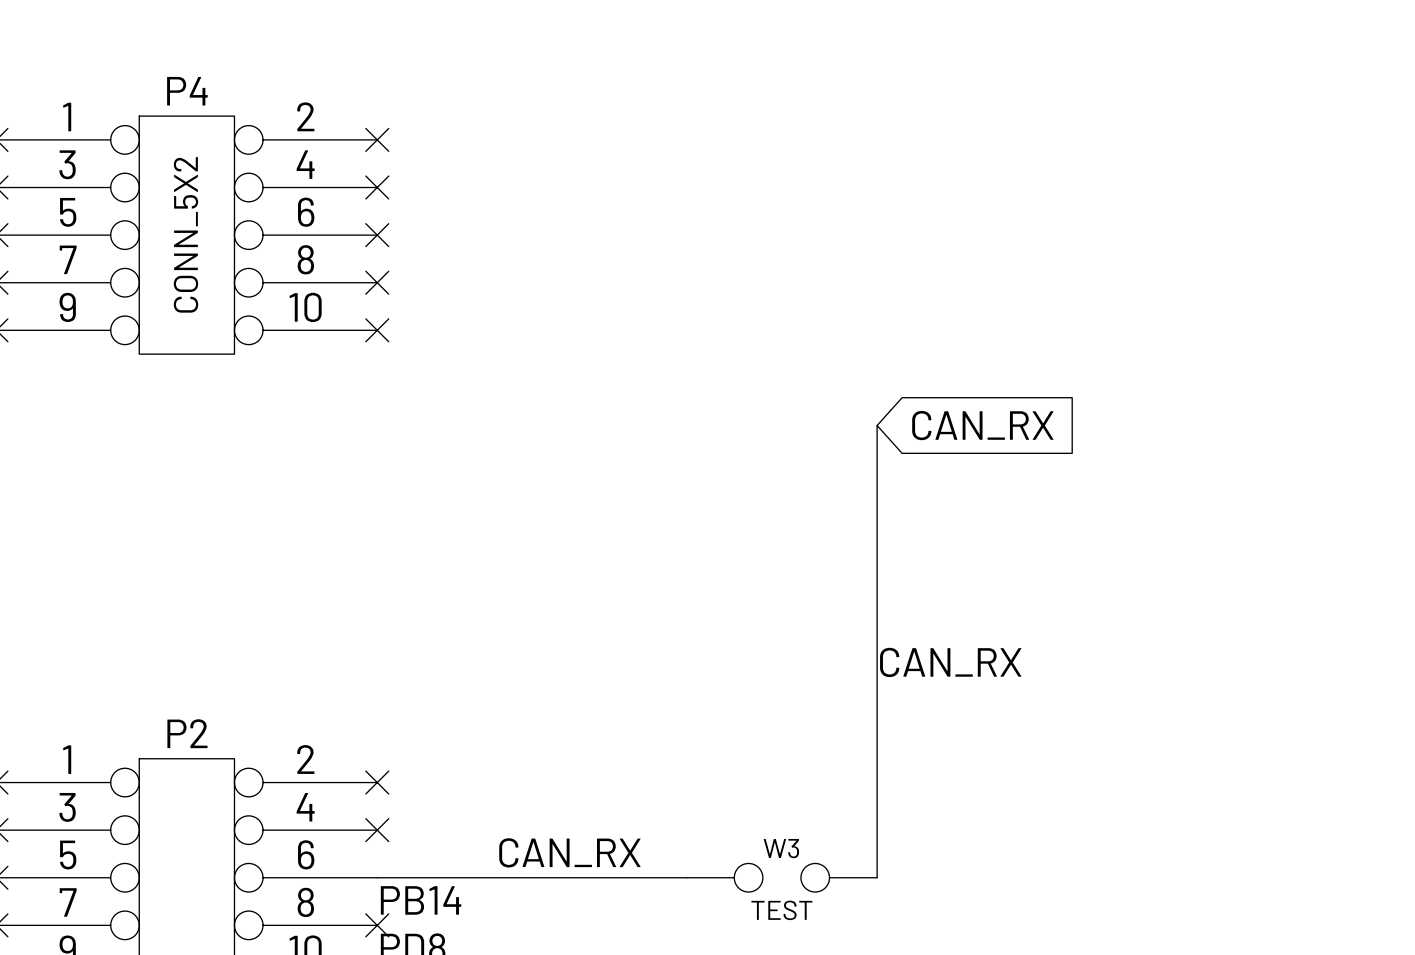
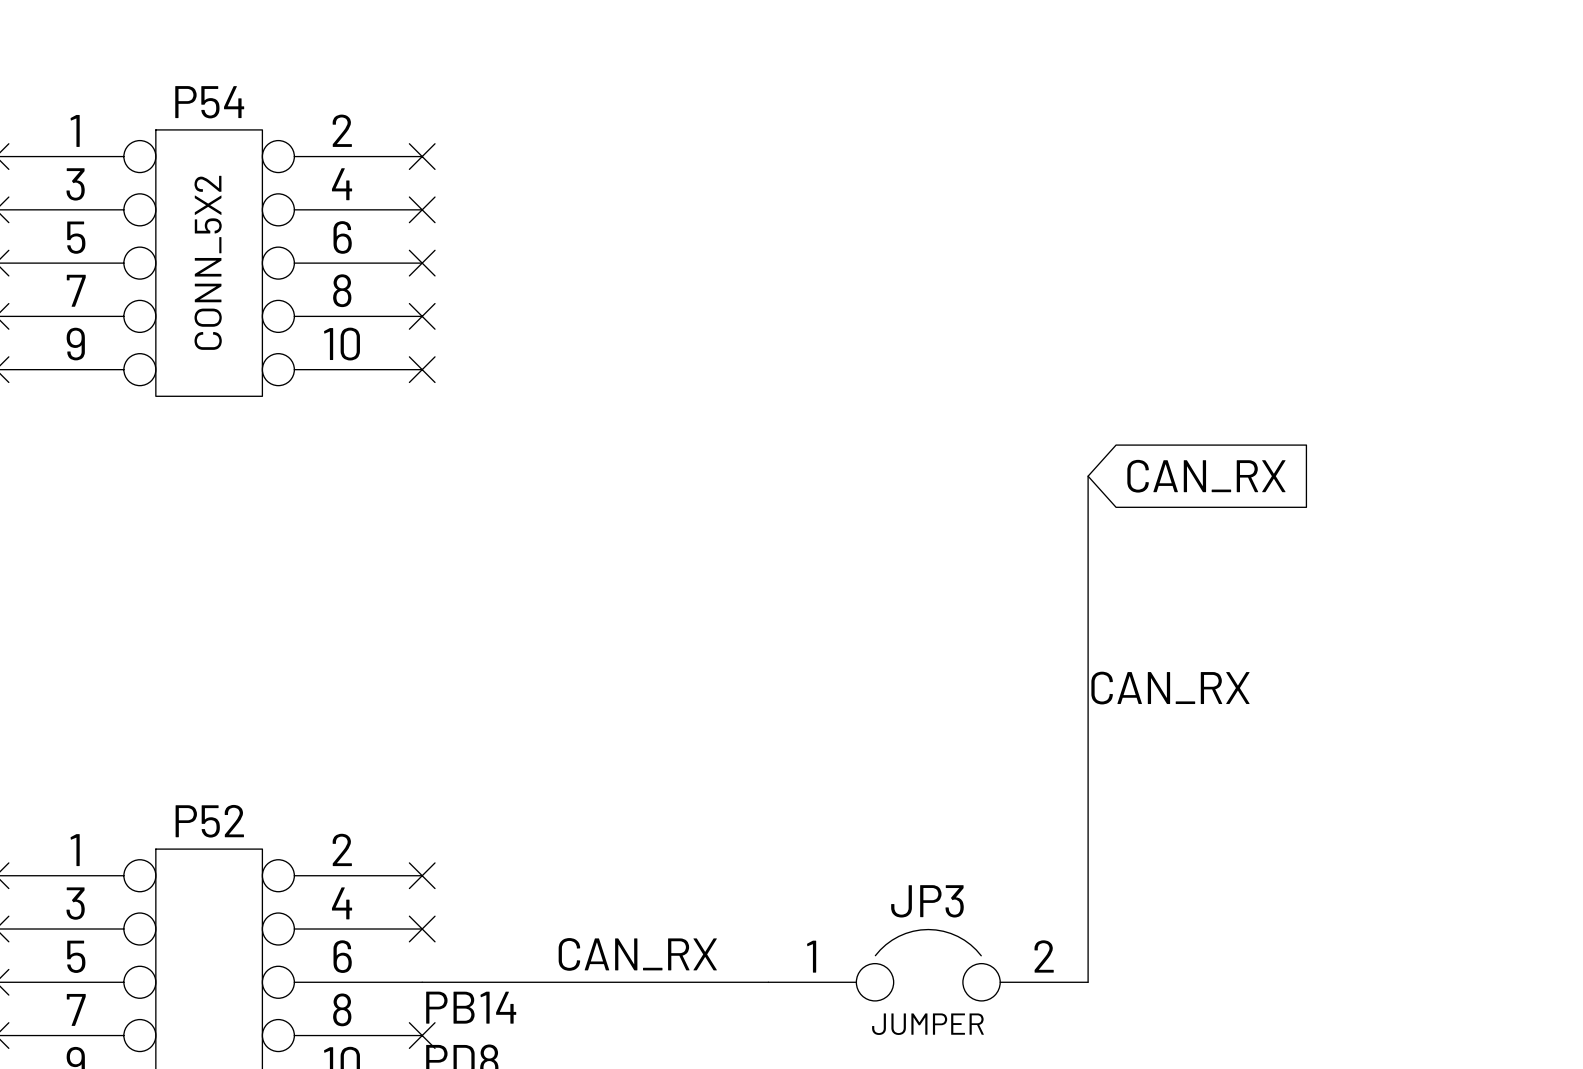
P4 name: P4 (187, 91) -> P54 (209, 102)
wire: (877, 425) (877, 877) -> (1088, 476) (1088, 982)
global label position: CAN_RX (982, 425) -> CAN_RX (1206, 476)
label position: CAN_RX (950, 662) -> CAN_RX (1170, 688)
P2 name: P2 (187, 733) -> P52 (209, 821)
JP3: none -> JUMPER (928, 965)
W3: TEST (781, 877) -> none

